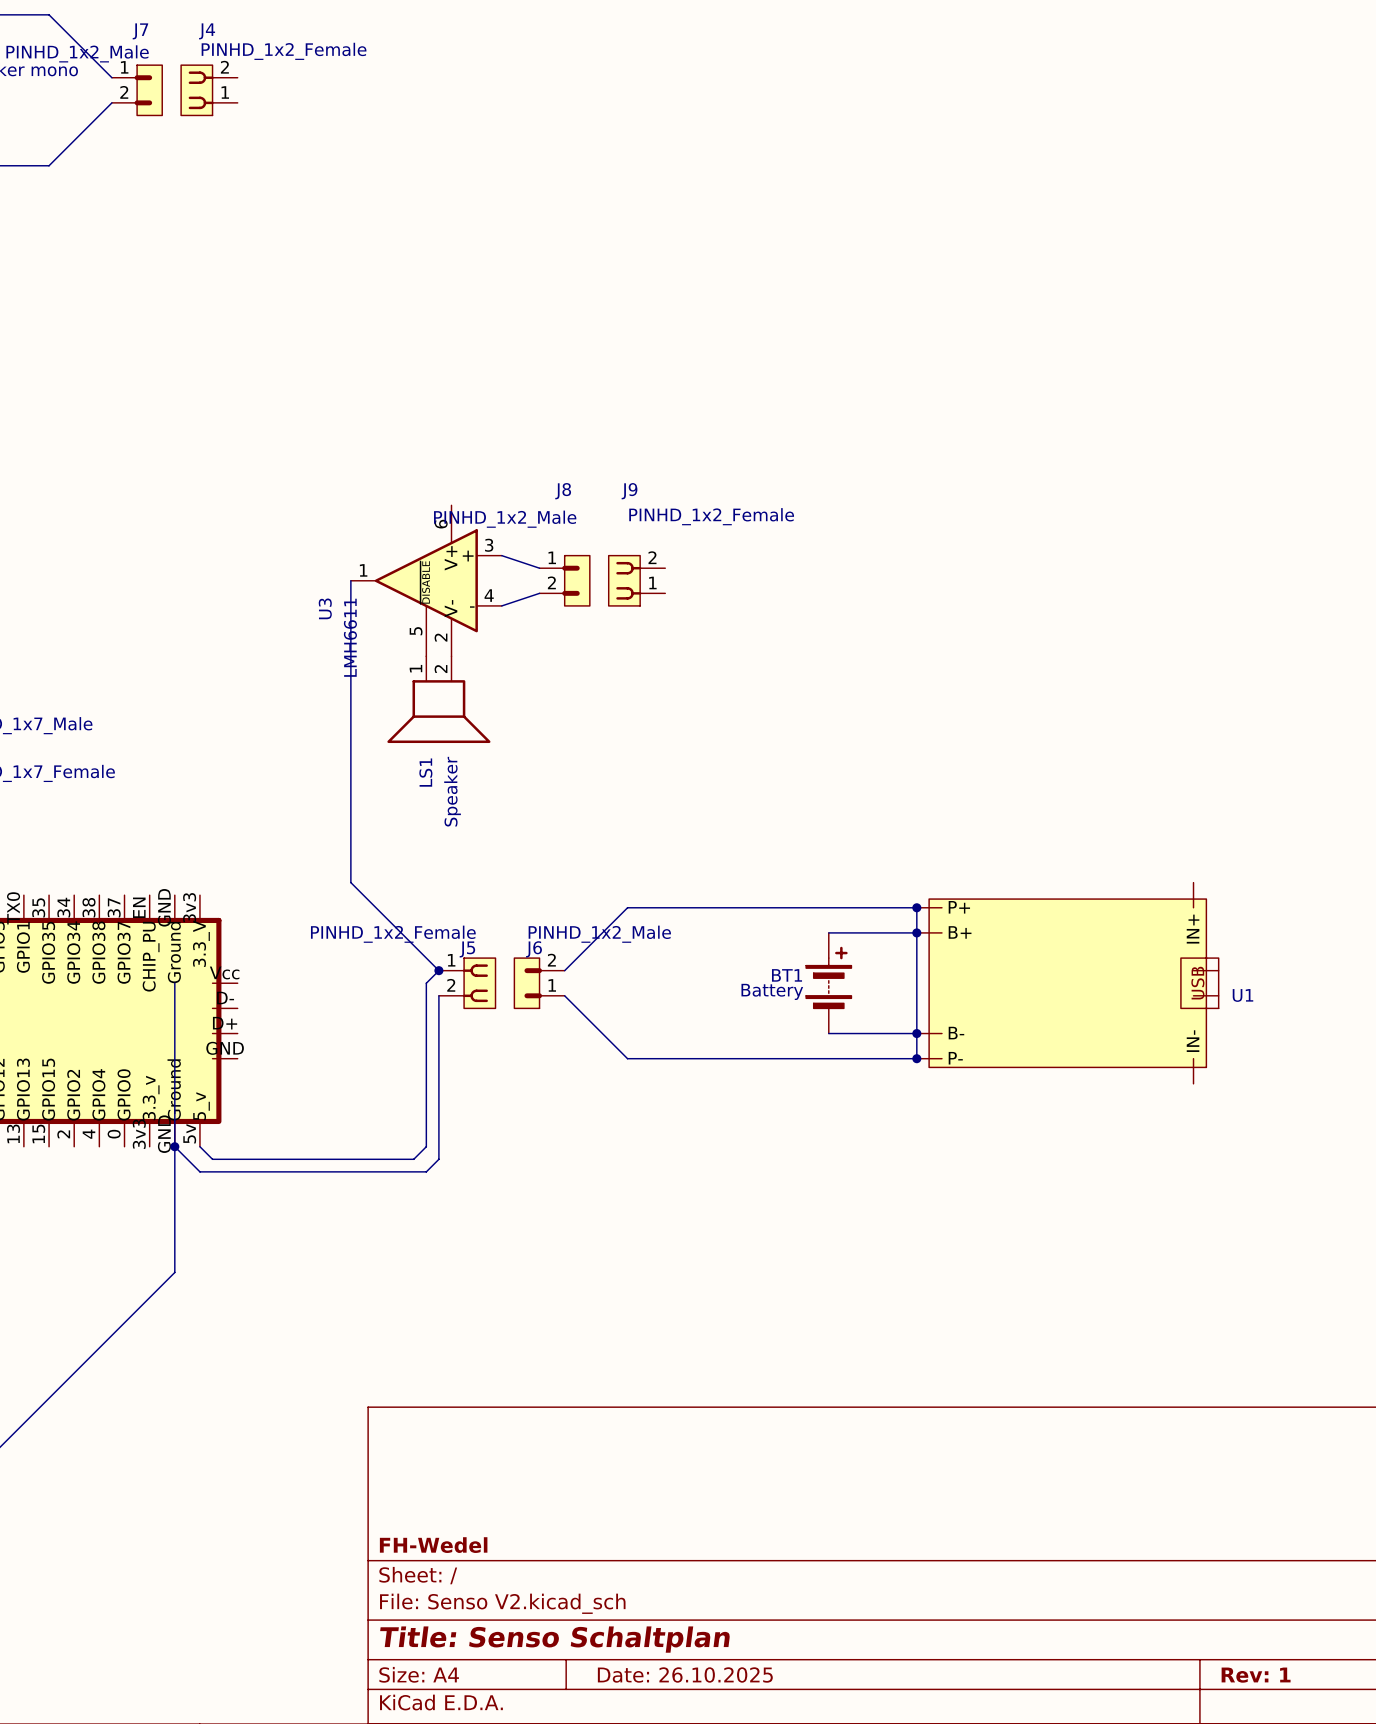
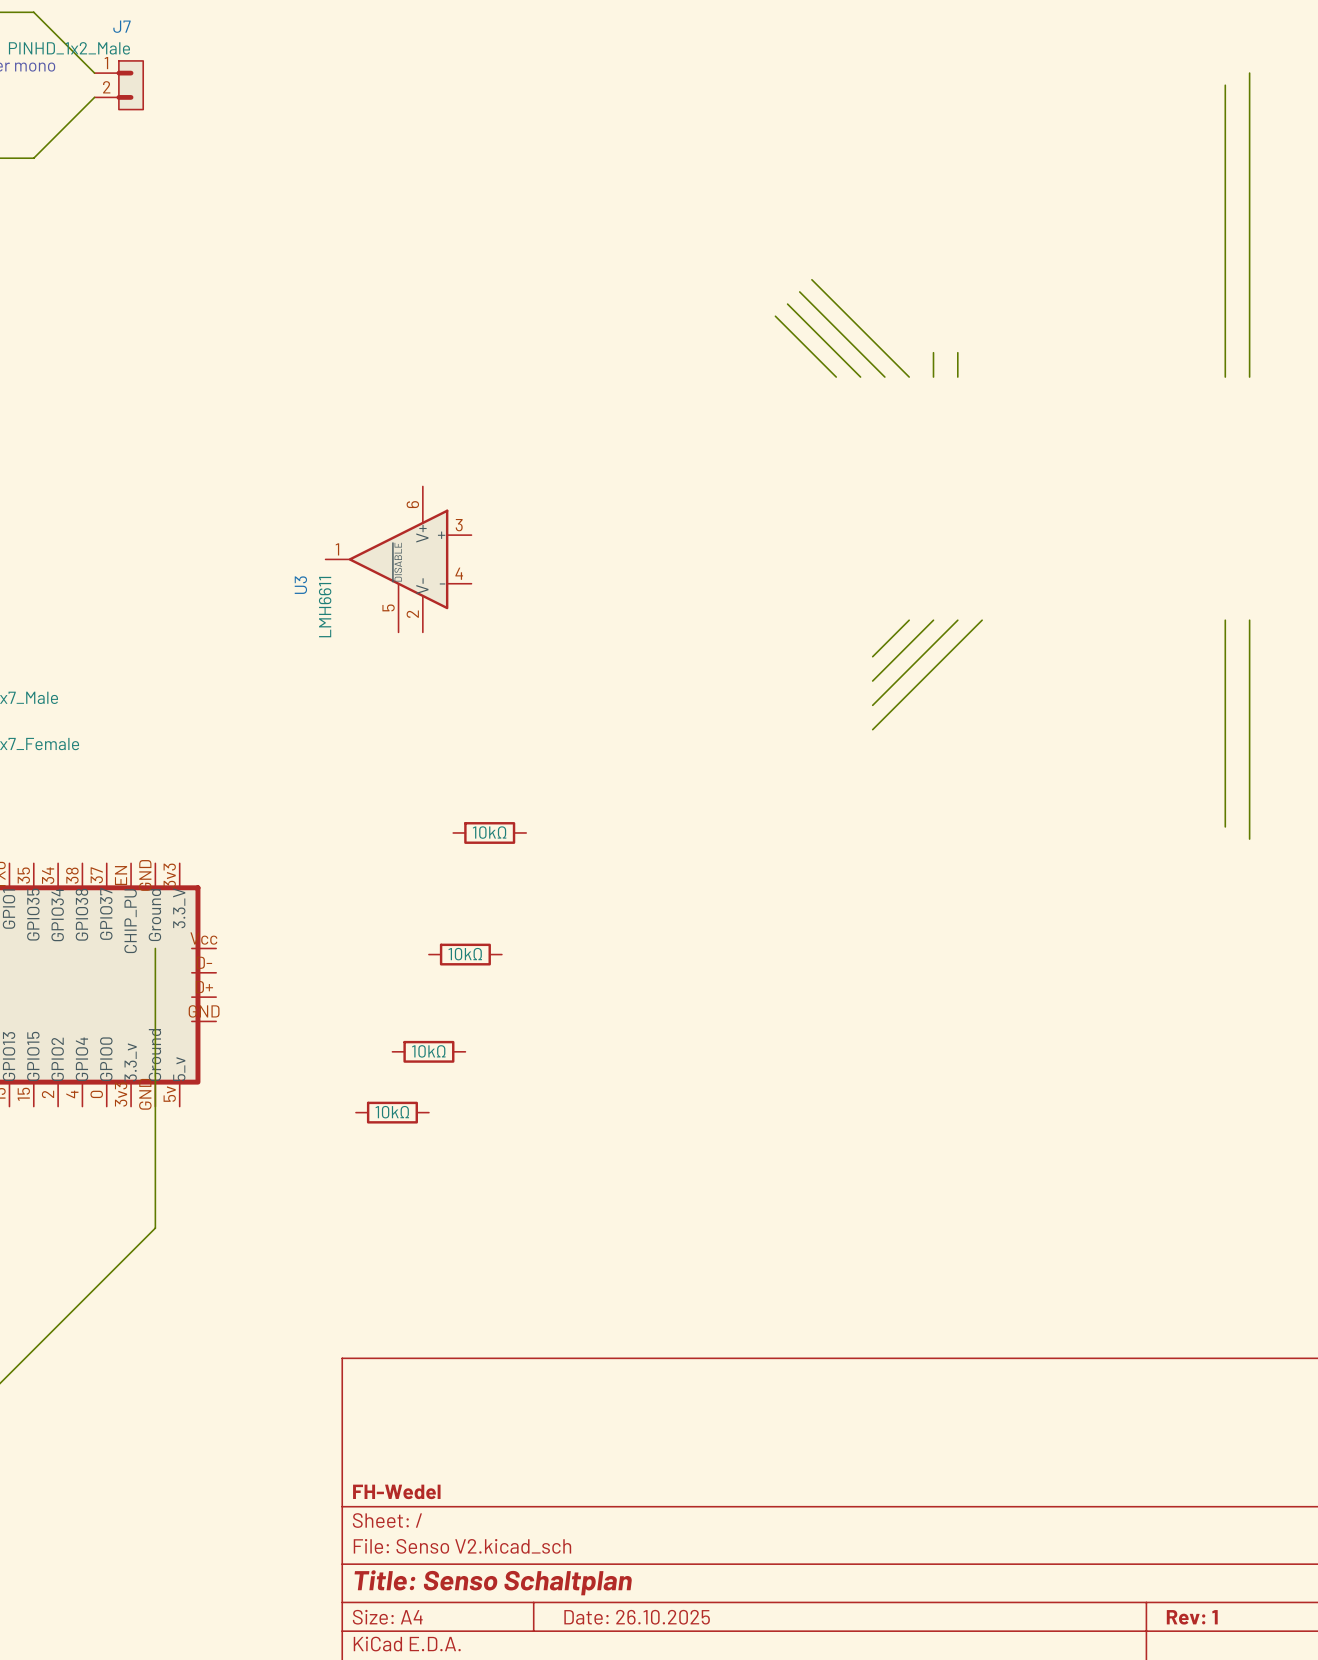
wire: none -> (1249, 73) (1249, 377)
J4: PINHD_1x2_Female (209, 90) -> none
wire: none -> (1225, 85) (1225, 377)
wire: none -> (811, 279) (909, 377)
wire: none -> (799, 291) (884, 377)
wire: none -> (787, 304) (860, 377)
wire: none -> (775, 316) (836, 377)
wire: none -> (933, 352) (933, 377)
wire: none -> (957, 352) (957, 377)
wire: (501, 555) (539, 568) -> none
wire: (350, 580) (350, 882) (438, 970) (426, 983) (426, 1146) (413, 1159) (212, 1159) (199, 1146) -> none
J8: PINHD_1x2_Male (564, 580) -> none
J9: PINHD_1x2_Female (637, 580) -> none
wire: (539, 593) (501, 605) -> none
wire: none -> (909, 620) (872, 656)
wire: none -> (933, 620) (872, 681)
wire: none -> (957, 620) (872, 705)
wire: none -> (982, 620) (872, 729)
wire: none -> (1225, 620) (1225, 826)
wire: none -> (1249, 620) (1249, 839)
LS1: Speaker (438, 699) -> none
part: none -> 10kΩ (489, 832)
junction: (916, 907) -> none
wire: (828, 932) (916, 932) -> none
junction: (916, 932) -> none
junction: (438, 970) -> none
wire: (564, 970) (627, 907) (916, 907) (916, 1058) (627, 1058) (564, 995) -> none
J5: PINHD_1x2_Female (467, 983) -> none
J6: PINHD_1x2_Male (539, 983) -> none
BT1: Battery (828, 983) -> none
U1: (1067, 983) -> none
part: none -> 10kΩ (465, 954)
wire: (438, 995) (438, 1159) (426, 1171) (199, 1171) (174, 1146) -> none
wire: (828, 1033) (916, 1033) -> none
junction: (916, 1033) -> none
junction: (916, 1058) -> none
part: none -> 10kΩ (428, 1051)
junction: (174, 1146) -> none
part: none -> 10kΩ (392, 1112)

